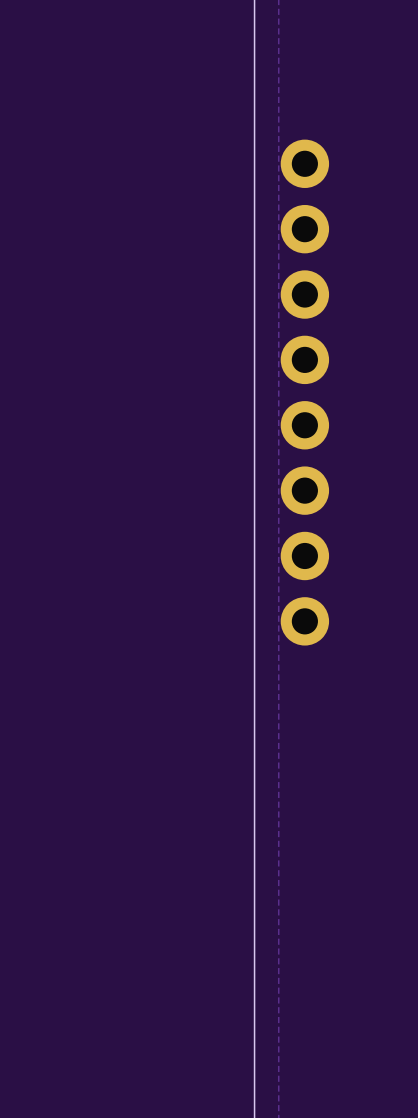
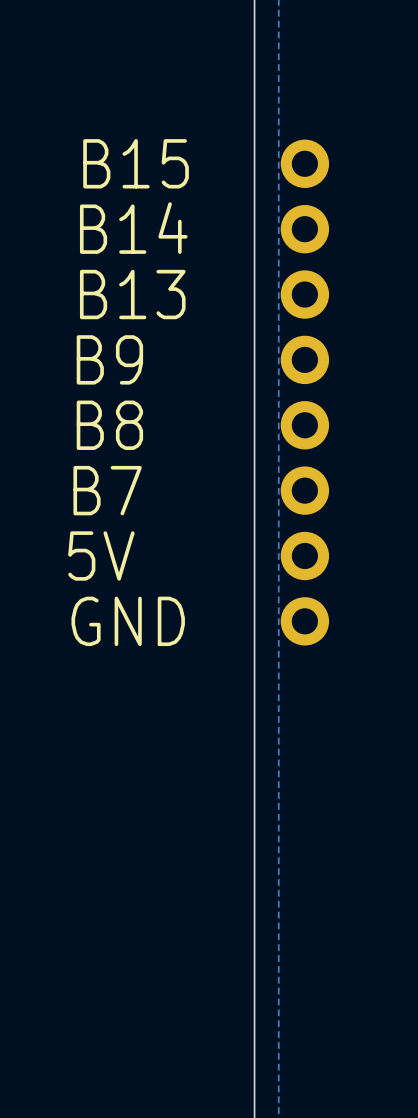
text: none -> B15 (136, 163)
text: none -> B14 (133, 228)
text: none -> B13 (132, 294)
text: none -> B9 (109, 359)
text: none -> B8 (109, 425)
text: none -> B7 (107, 490)
text: none -> 5V (101, 555)
text: none -> GND (128, 621)

